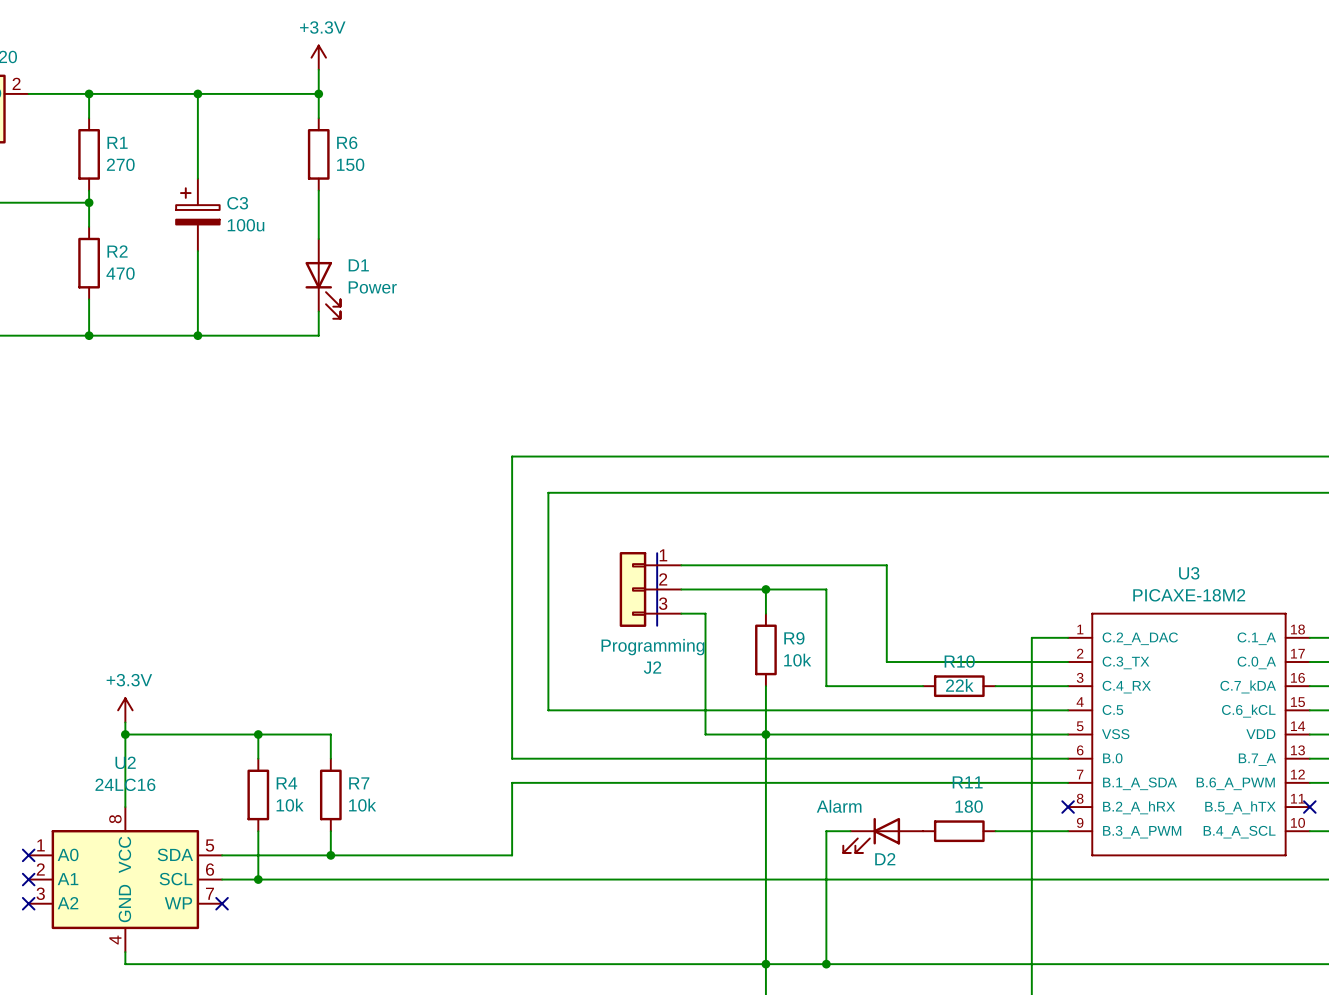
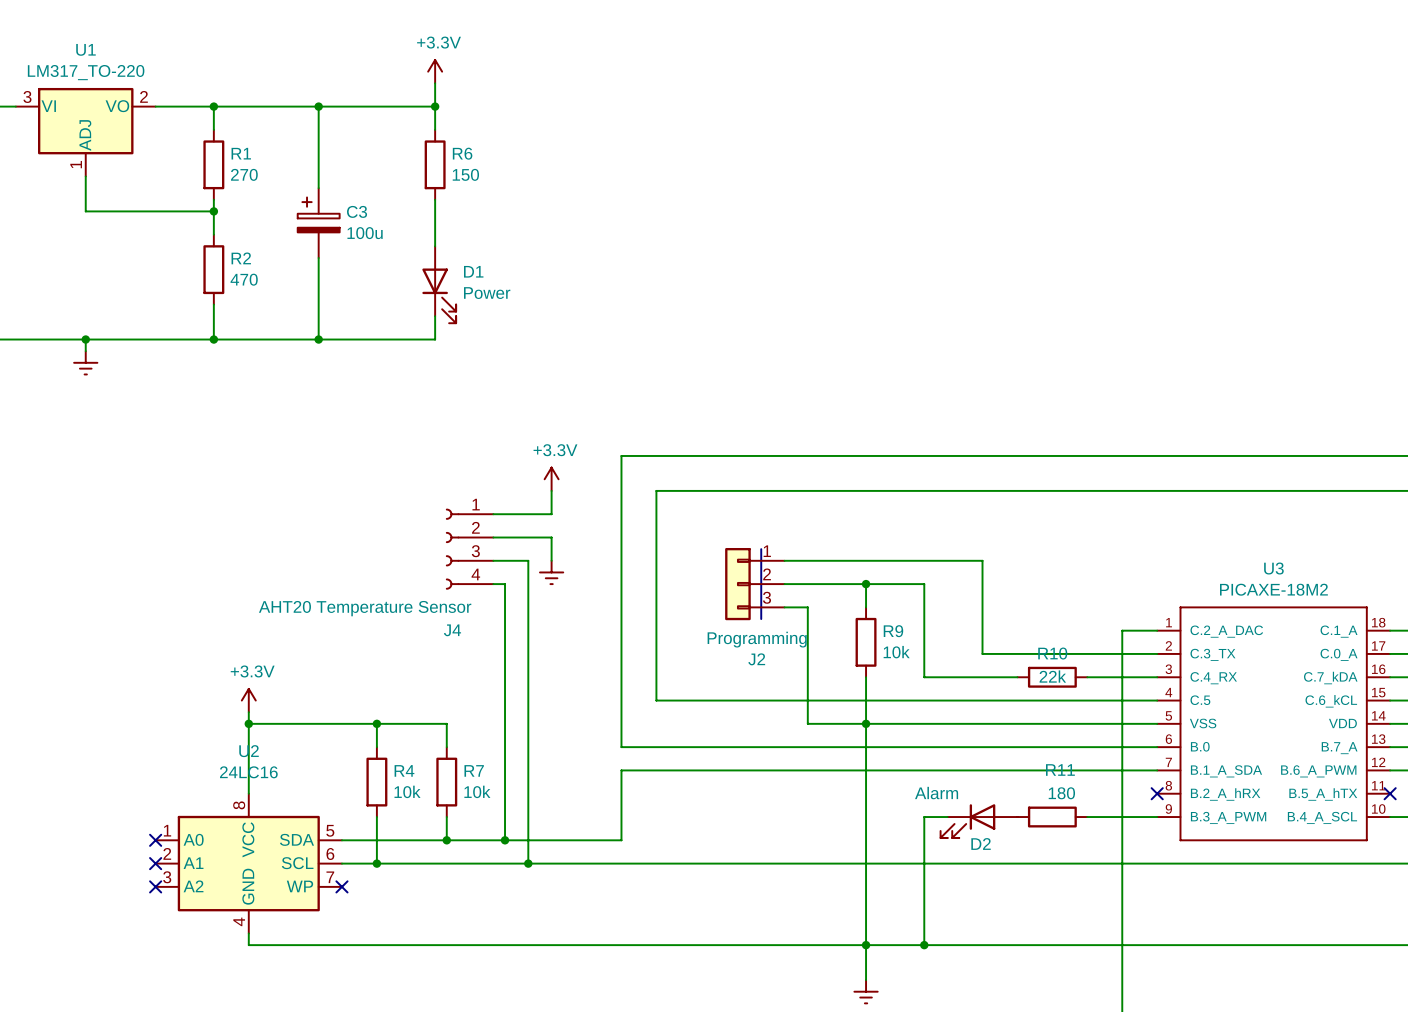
power symbol: none -> +3.3V (551, 479)
wire: none -> (551, 490) (551, 514) (493, 514)
wire: none -> (493, 537) (551, 537) (551, 560)
J4: none -> AHT20 Temperature Sensor (469, 549)
wire: none -> (493, 560) (528, 560) (528, 863)
power symbol: none -> (551, 572)
wire: none -> (493, 584) (505, 584) (505, 840)
junction: none -> (505, 840)
junction: none -> (528, 863)

